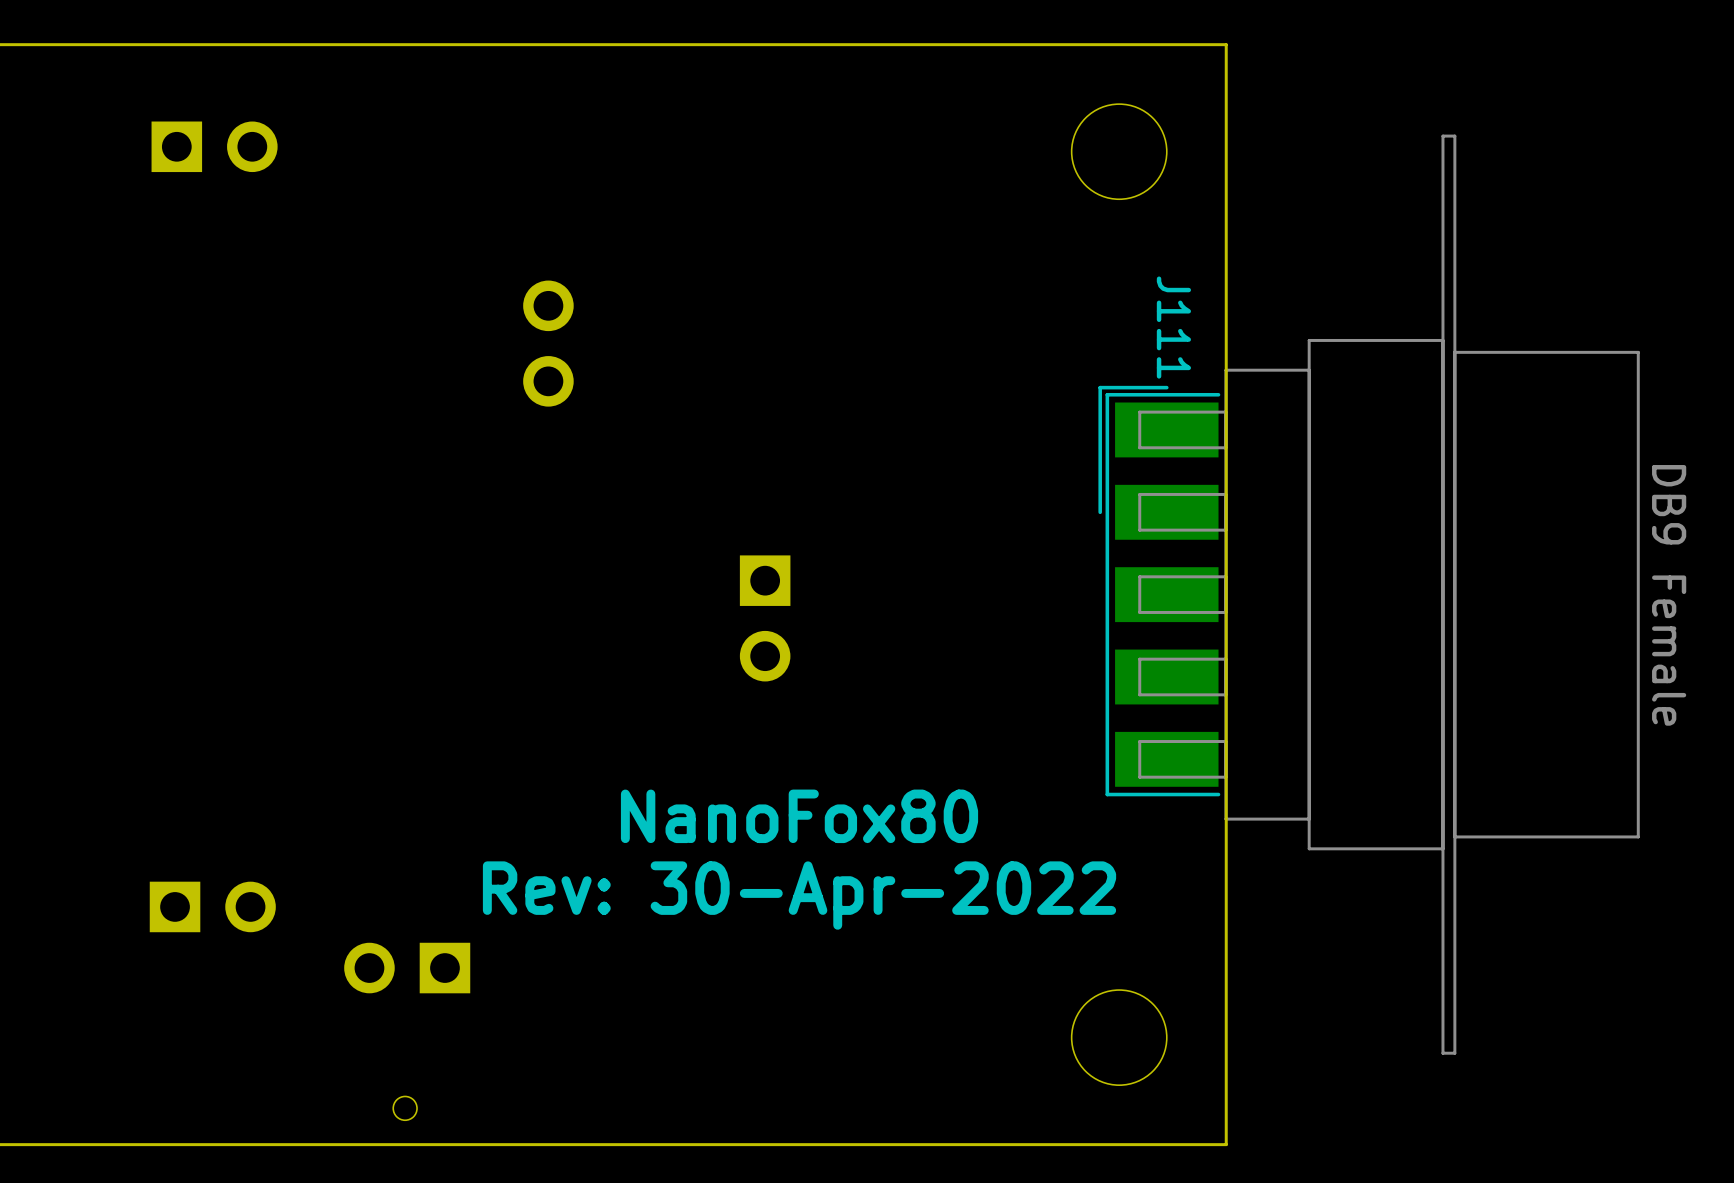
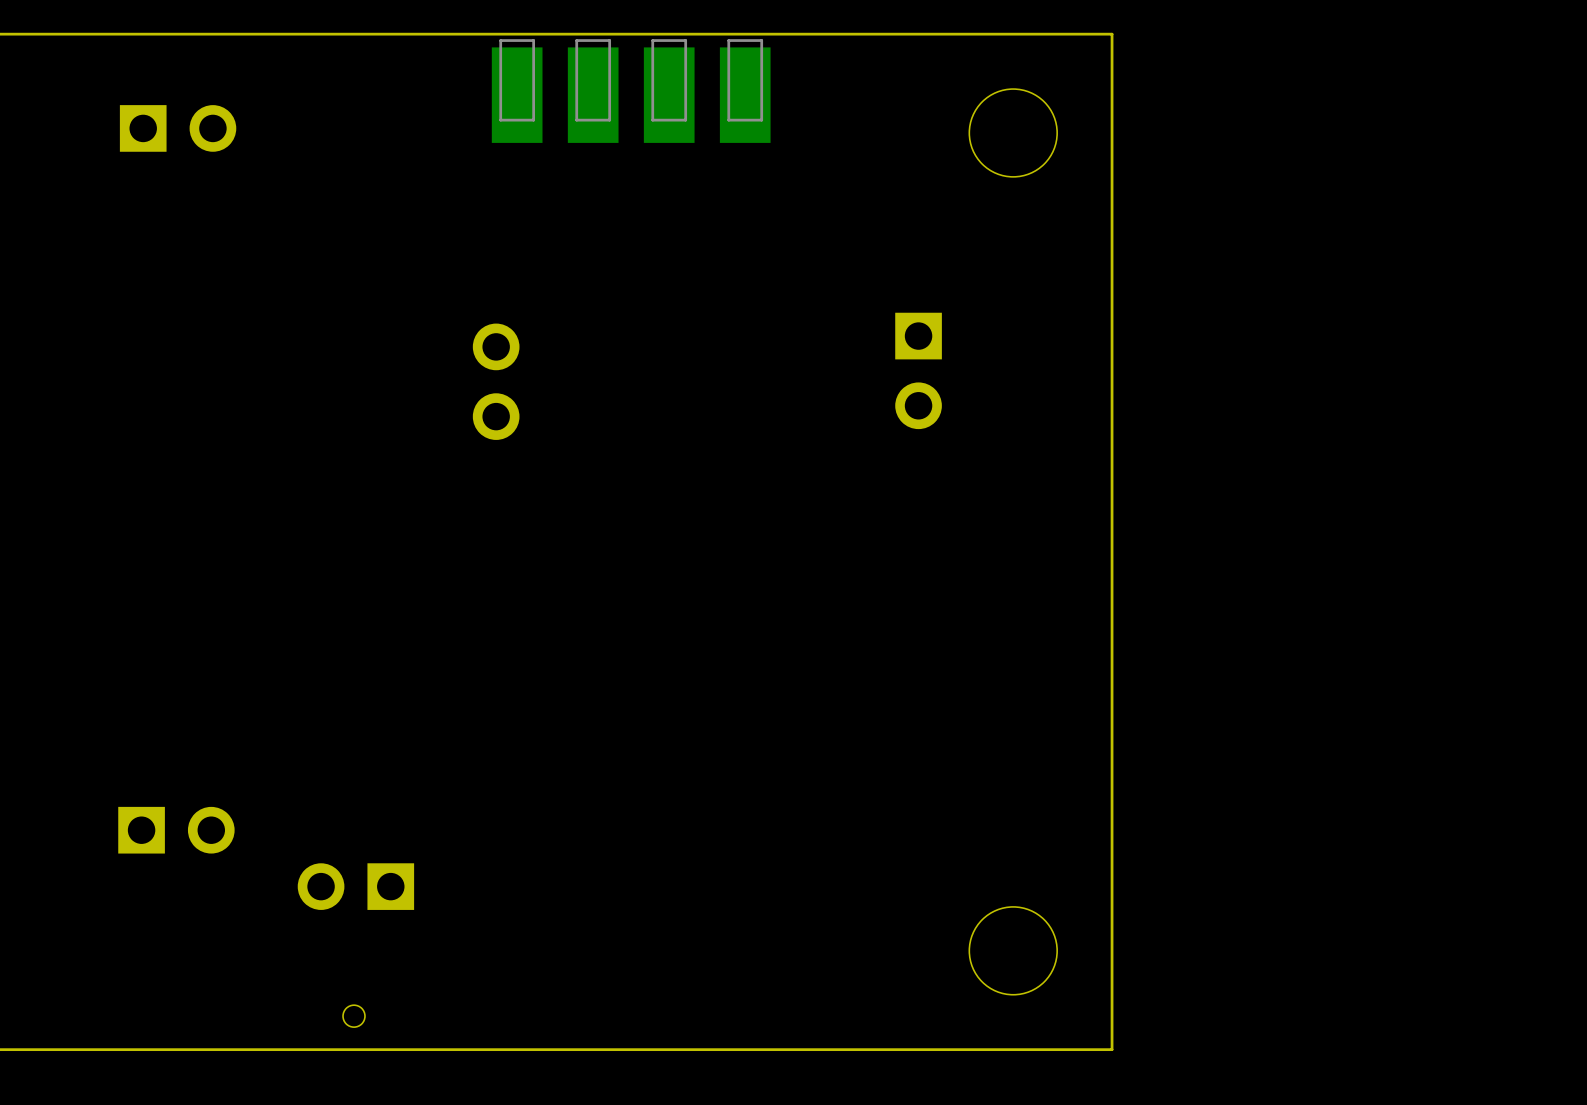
part: none -> (631, 91)
part position: (548, 343) -> (496, 381)
J111: DB9 Female (1369, 594) -> none
part position: (765, 618) -> (918, 370)
text: NanoFox80 (799, 816) -> none
text: Rev: 30-Apr-2022 (799, 895) -> none

